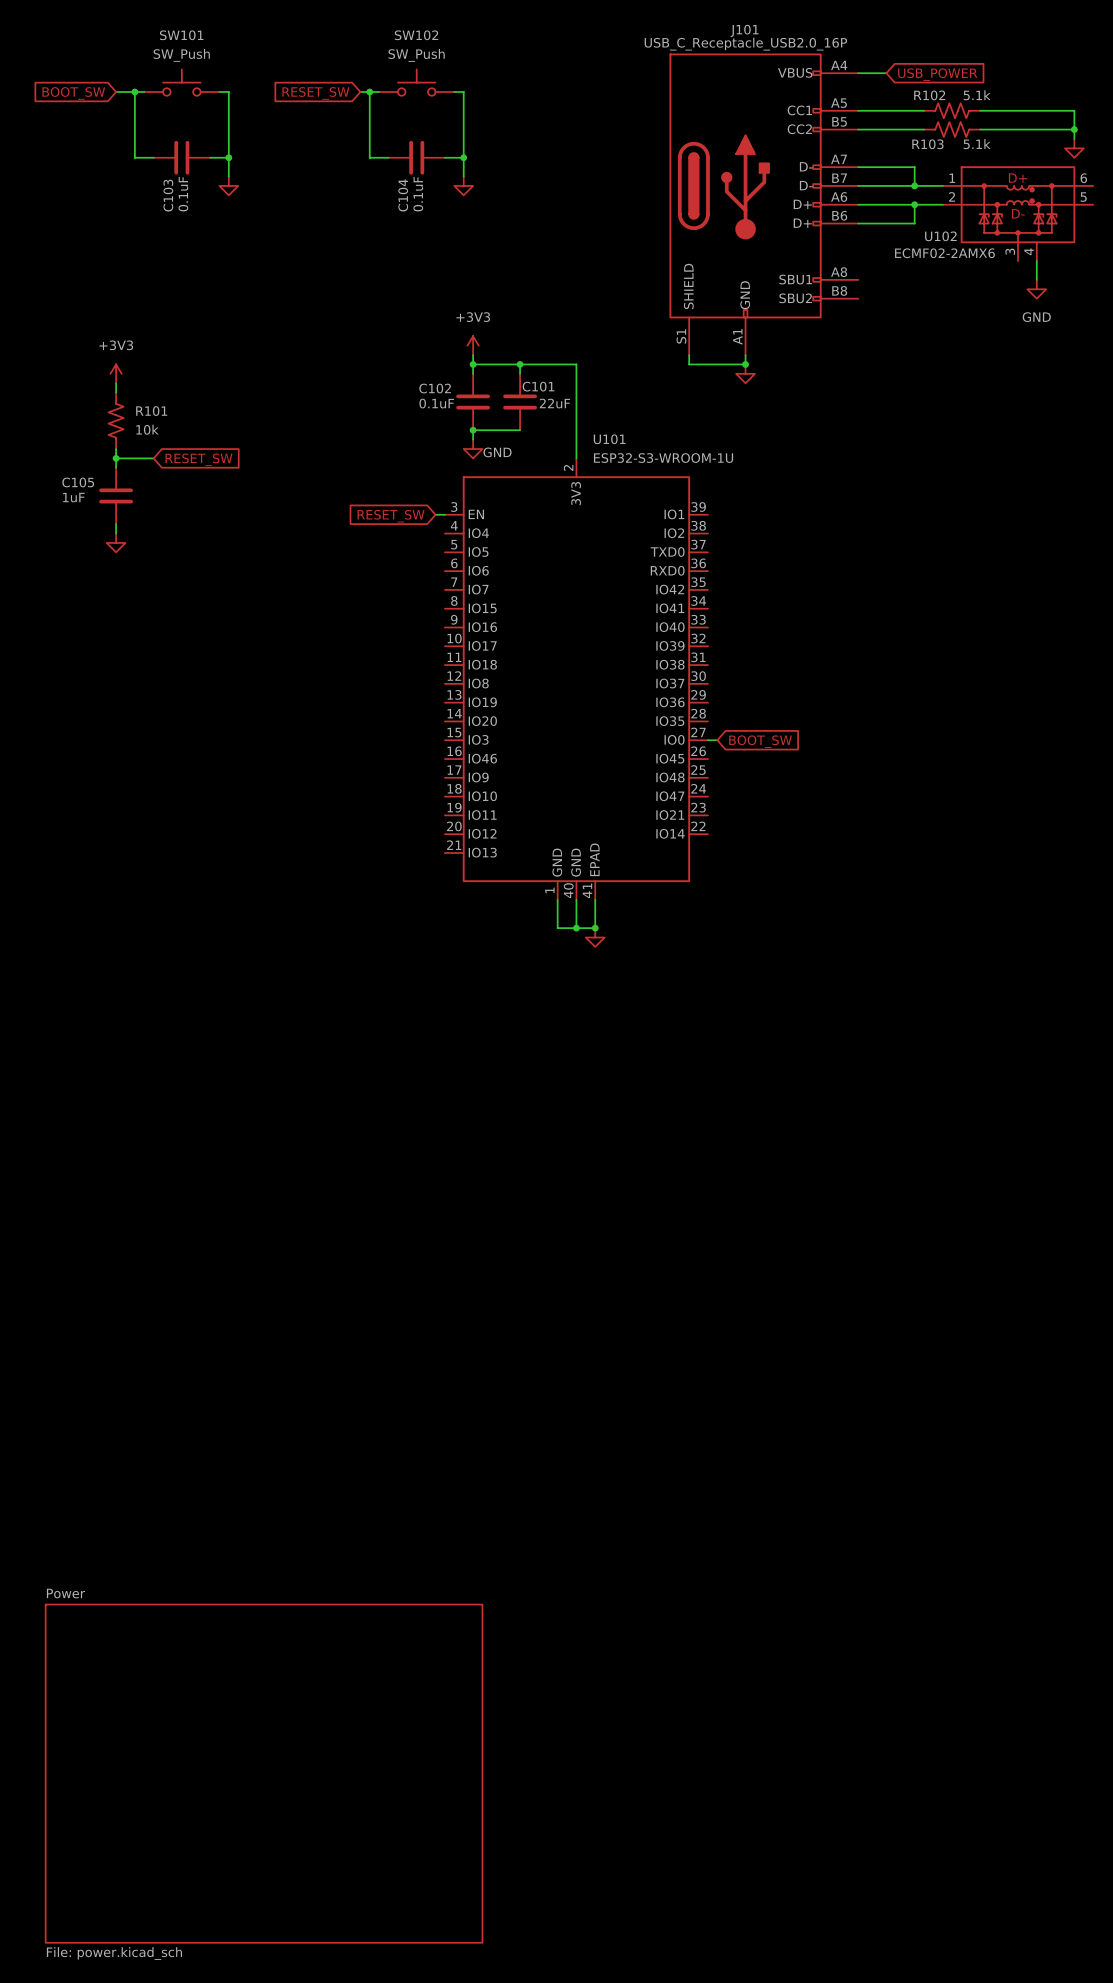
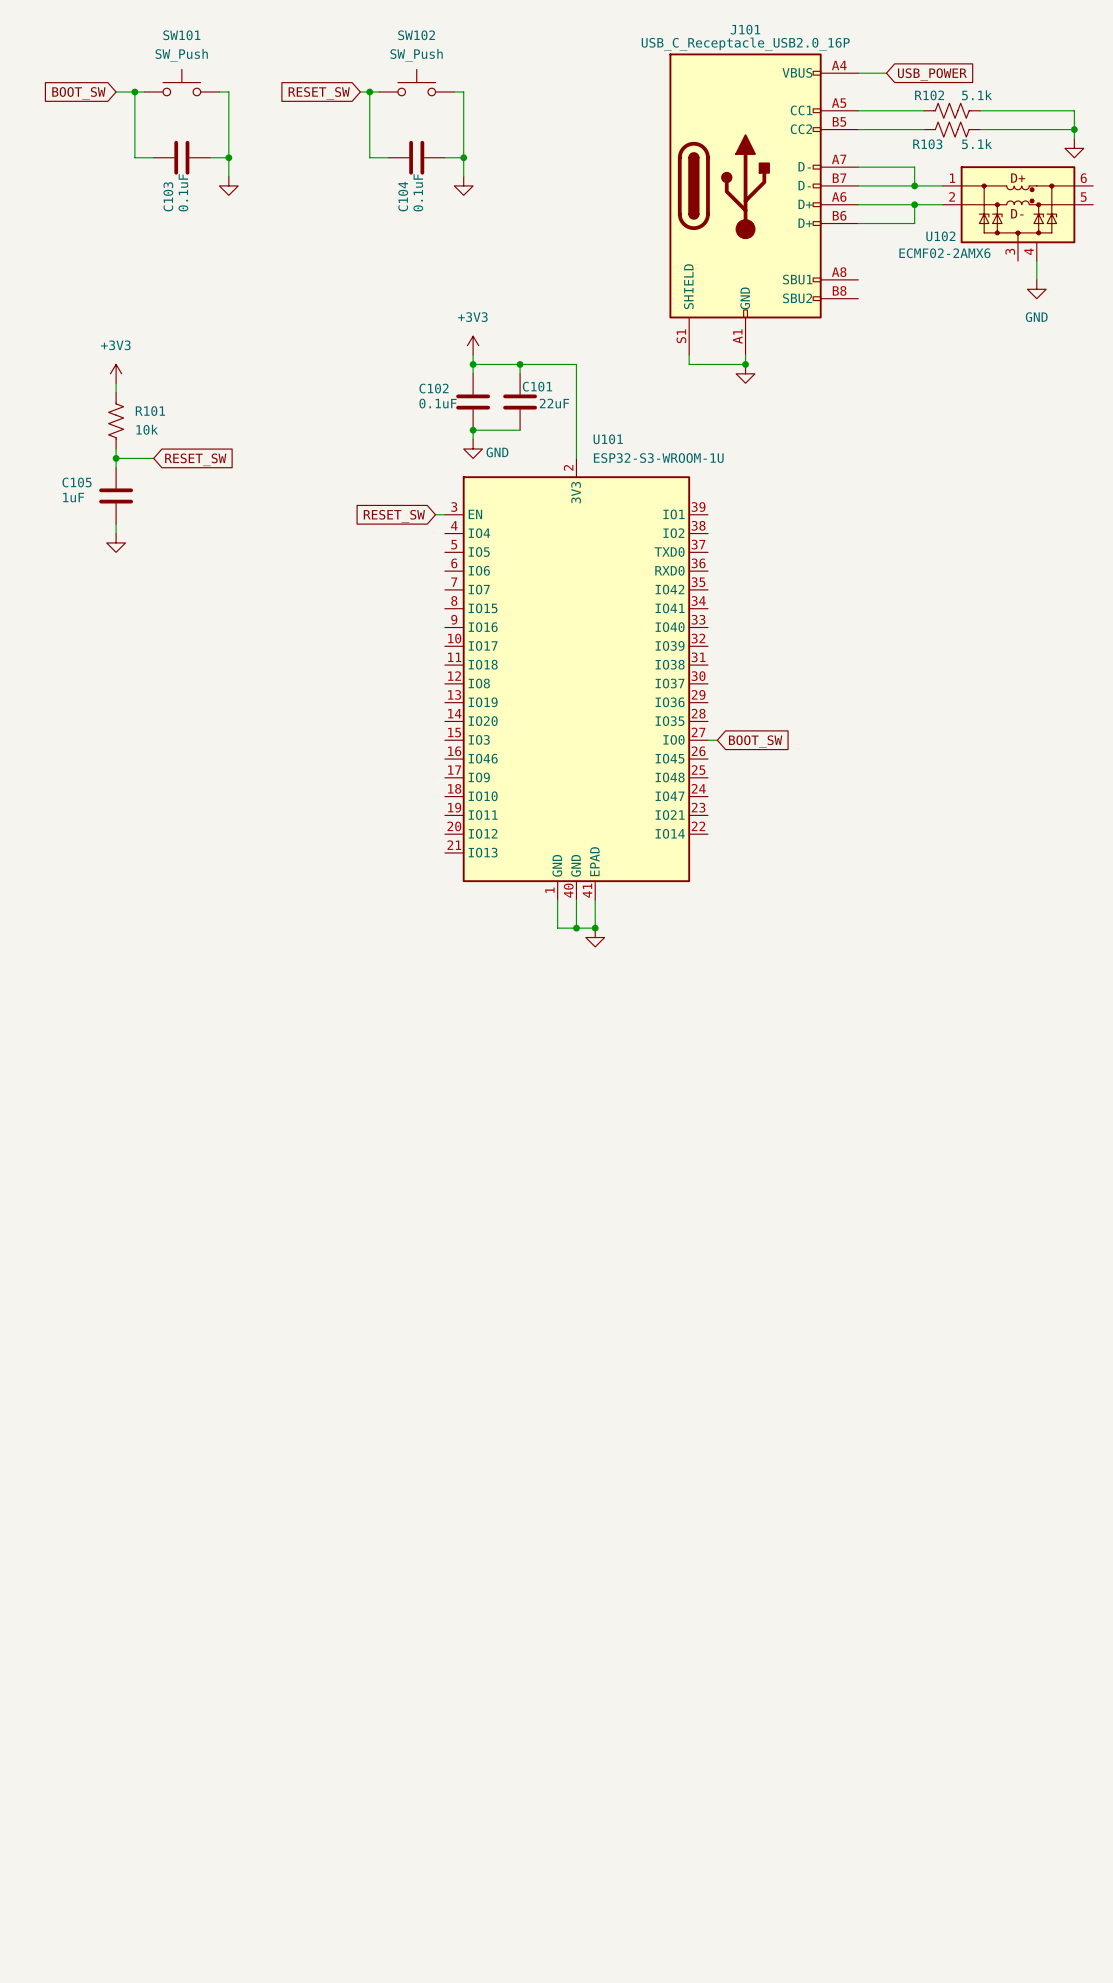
sheet Power: File: power.kicad_sch (264, 1773) -> none

